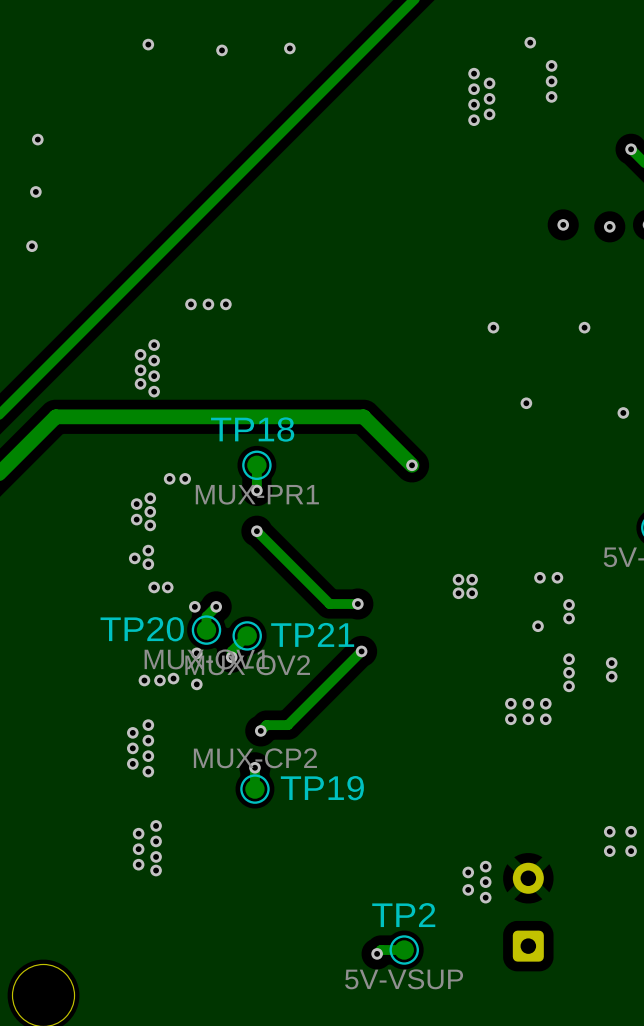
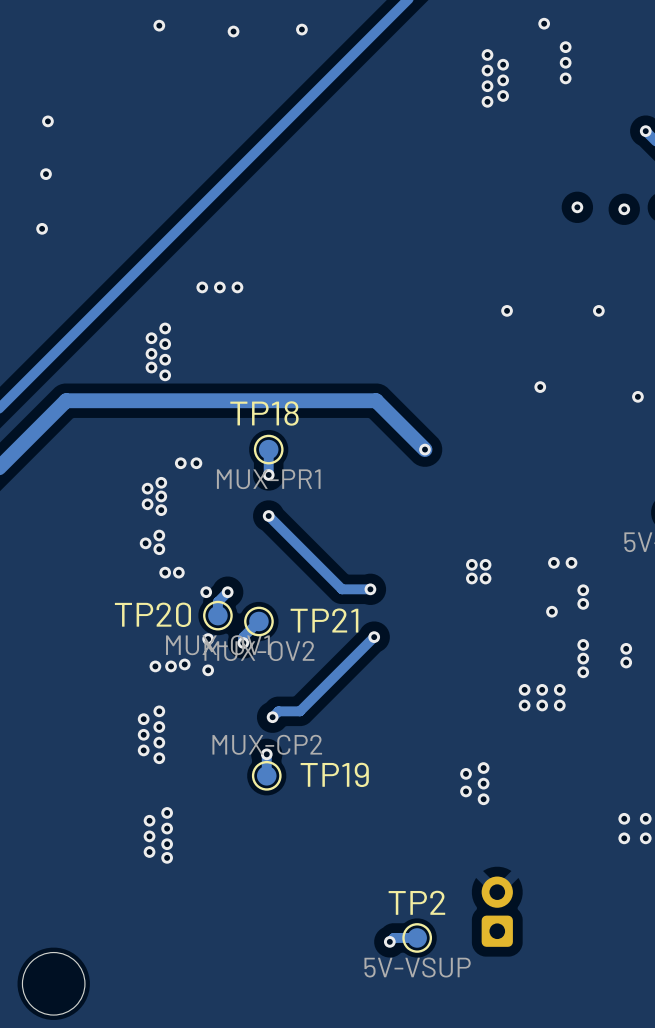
via: none -> (483, 768)
via: none -> (466, 773)
via: none -> (483, 783)
via: none -> (466, 791)
via: none -> (483, 799)
via: (485, 866) -> none
via: (468, 872) -> none
via: (485, 882) -> none
via: (468, 889) -> none
via: (485, 897) -> none
part: (528, 912) -> none
part: none -> (497, 911)

